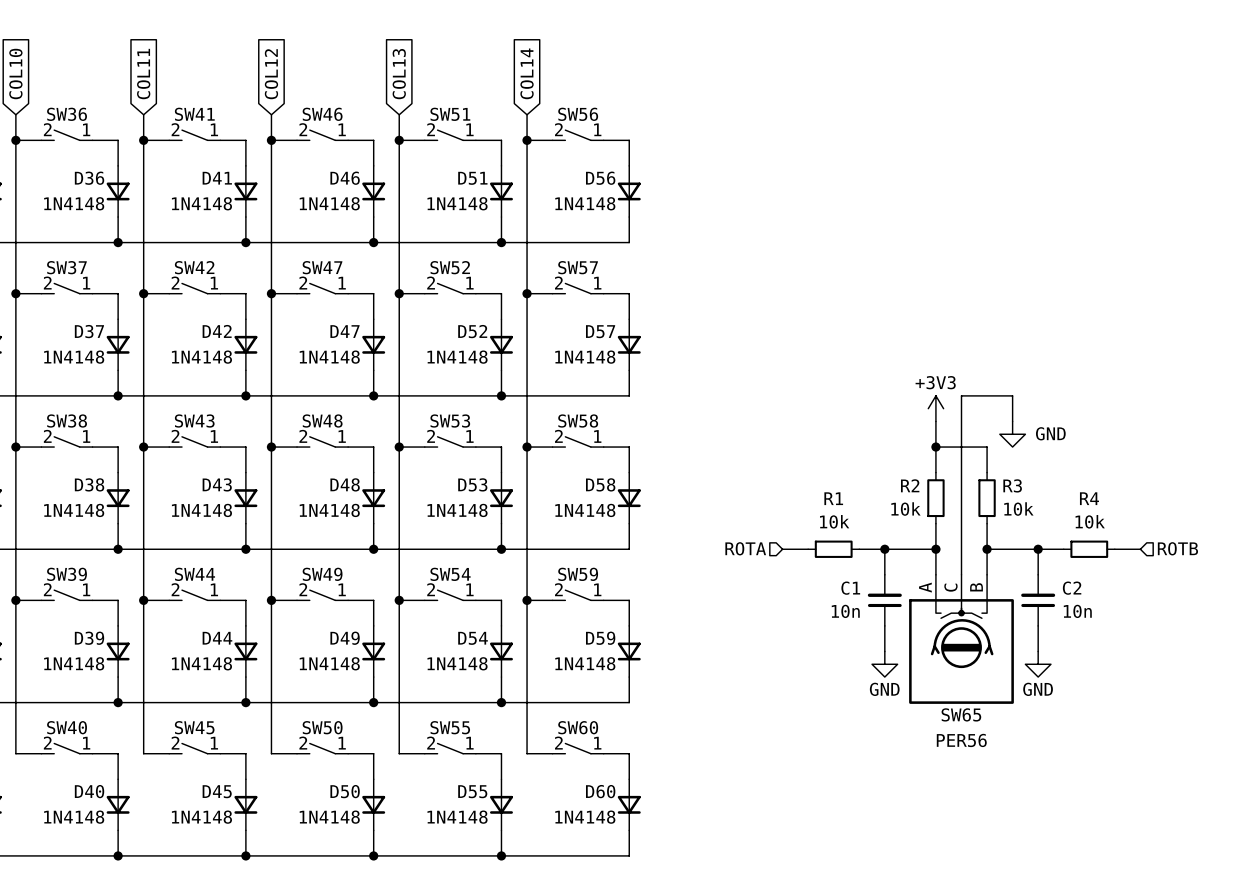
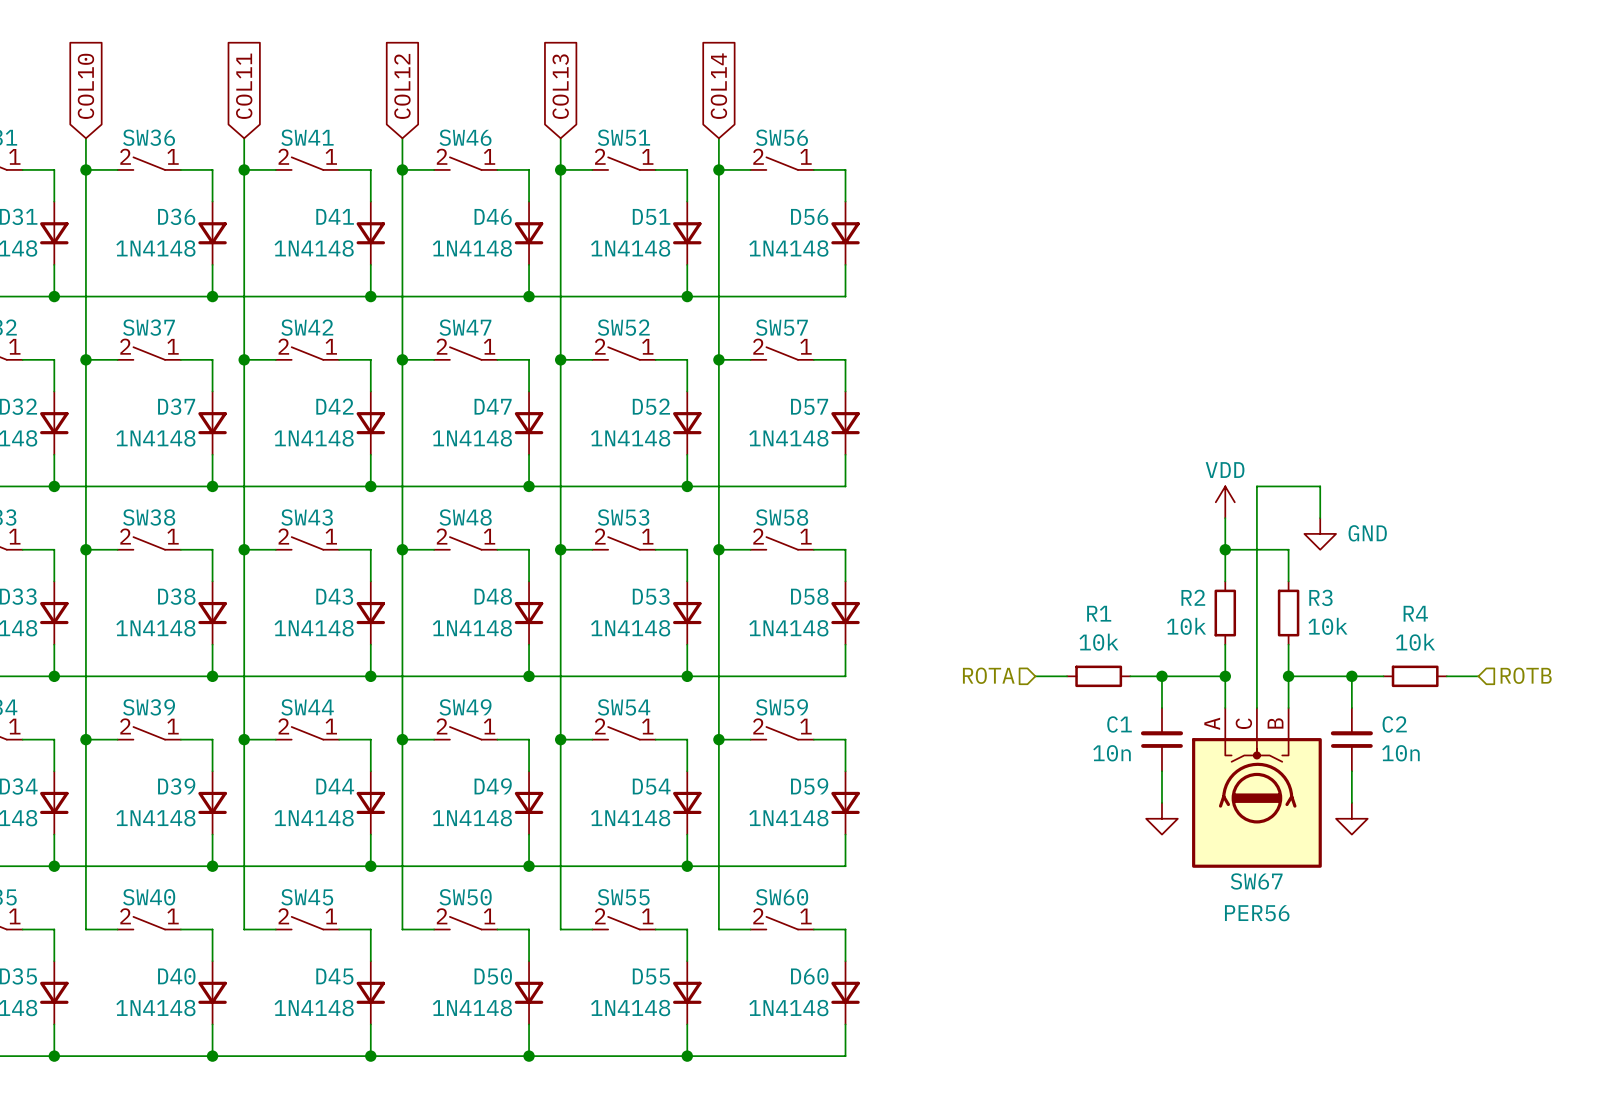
power symbol: +3V3 (935, 408) -> VDD (1225, 502)
power symbol text: GND (884, 689) -> none
power symbol text: GND (1038, 689) -> none
SW65 name: SW65 (961, 714) -> SW67 (1256, 881)

